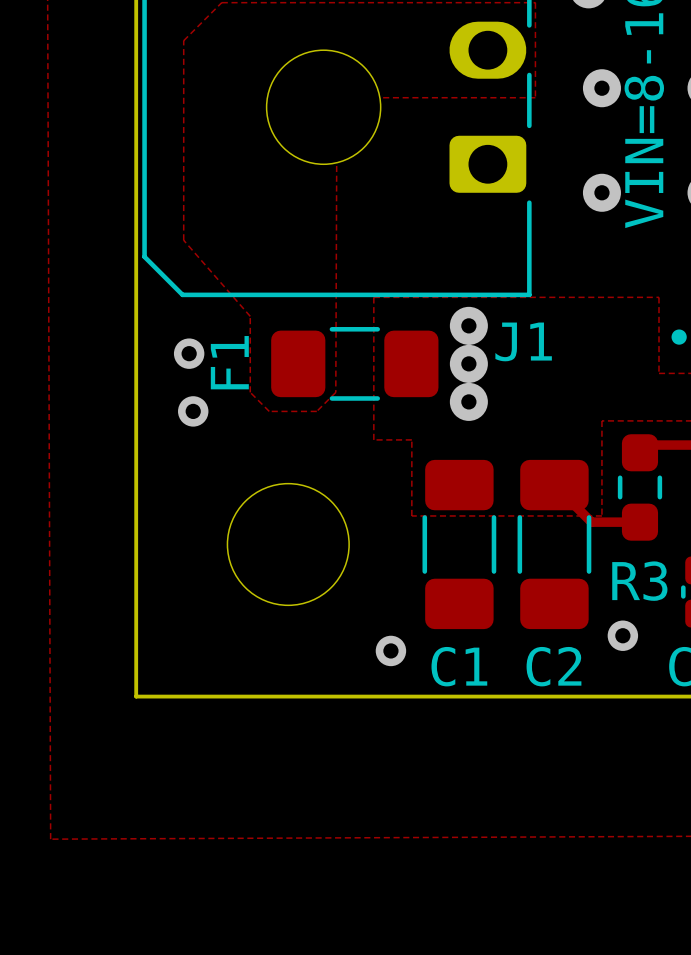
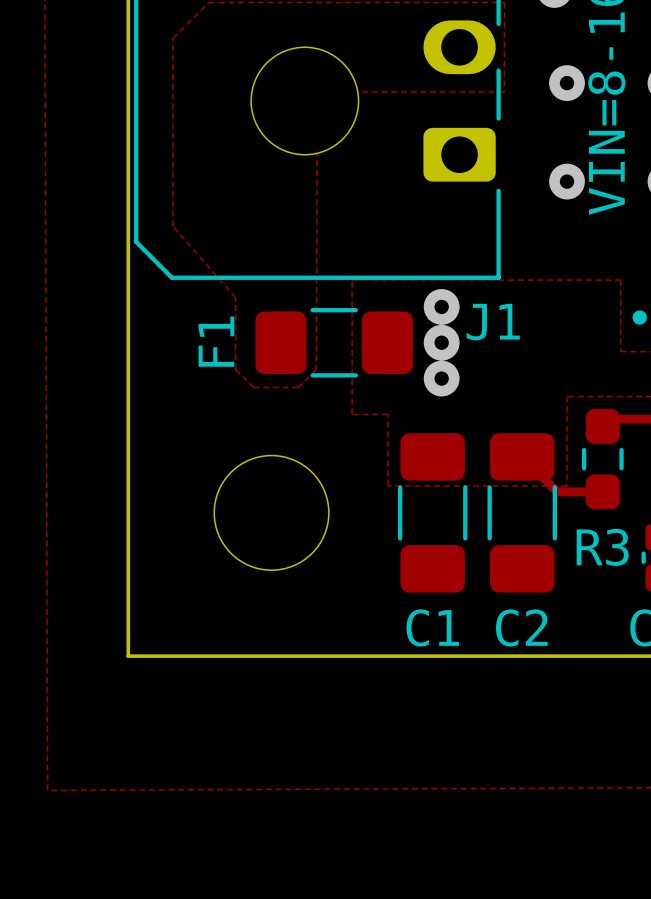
via: (189, 353) -> none
via: (193, 411) -> none
via: (622, 635) -> none
via: (390, 650) -> none

